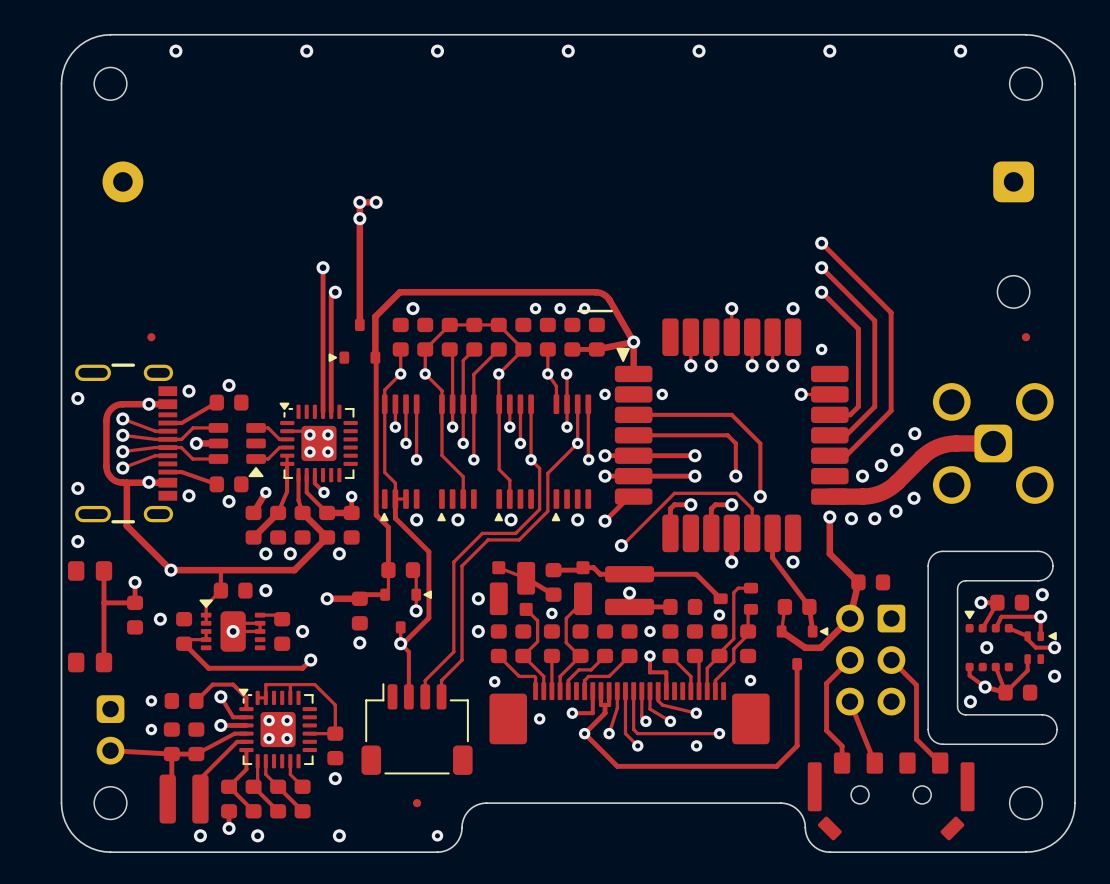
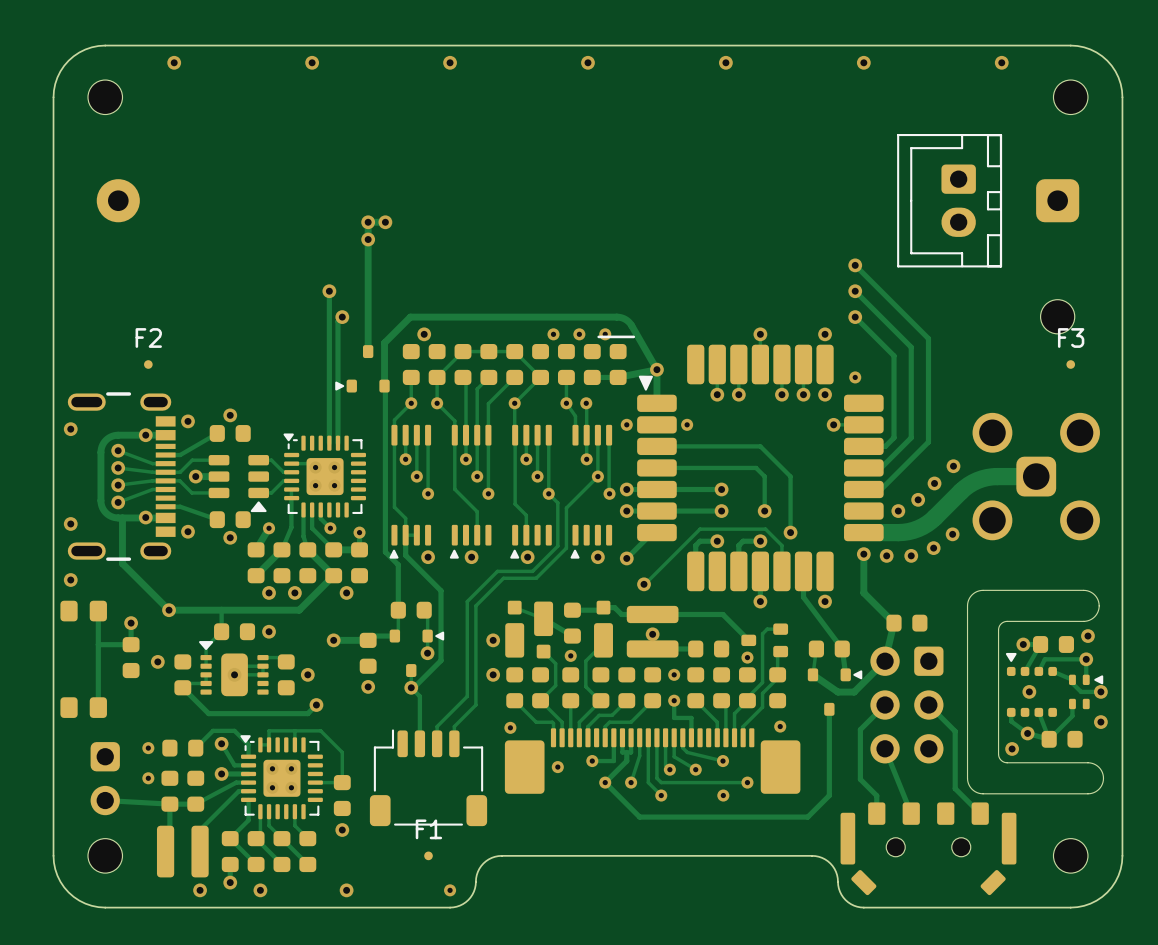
part: none -> (949, 200)
F2 name: none -> F2 (148, 338)
F3 name: none -> F3 (1071, 338)
F1 name: none -> F1 (428, 829)

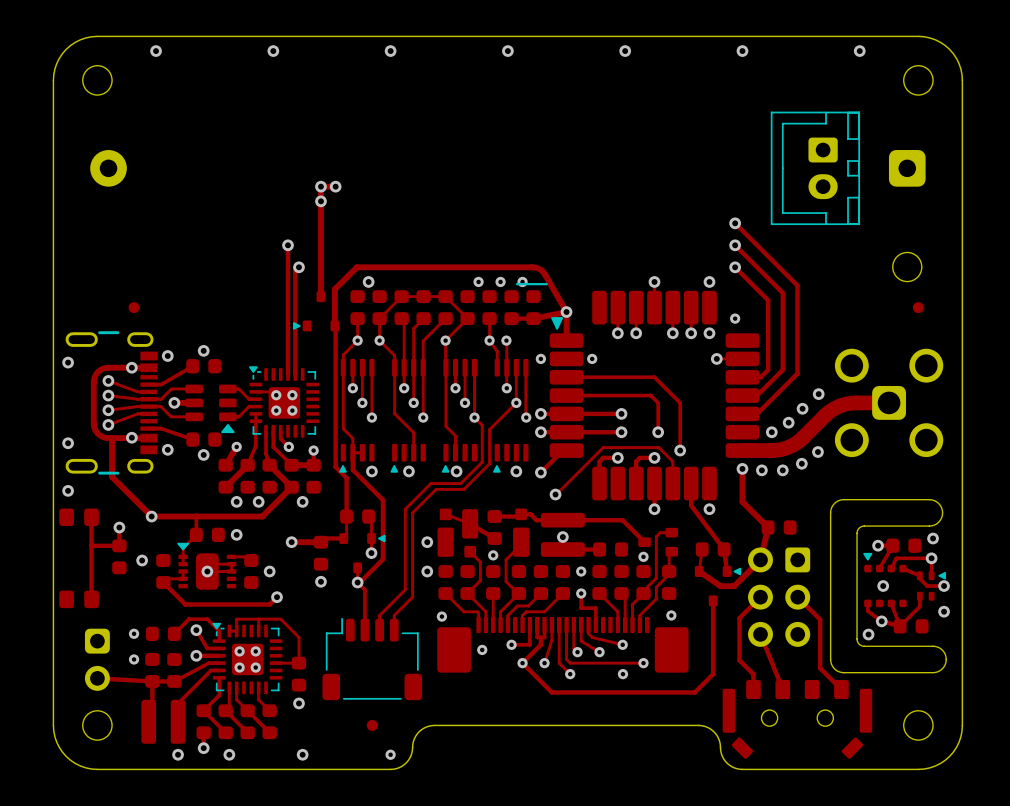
F2: (148, 364) -> none
part: none -> (134, 307)
F3: (1070, 364) -> none
part: none -> (918, 307)
F1: (428, 855) -> none
part: none -> (372, 725)

